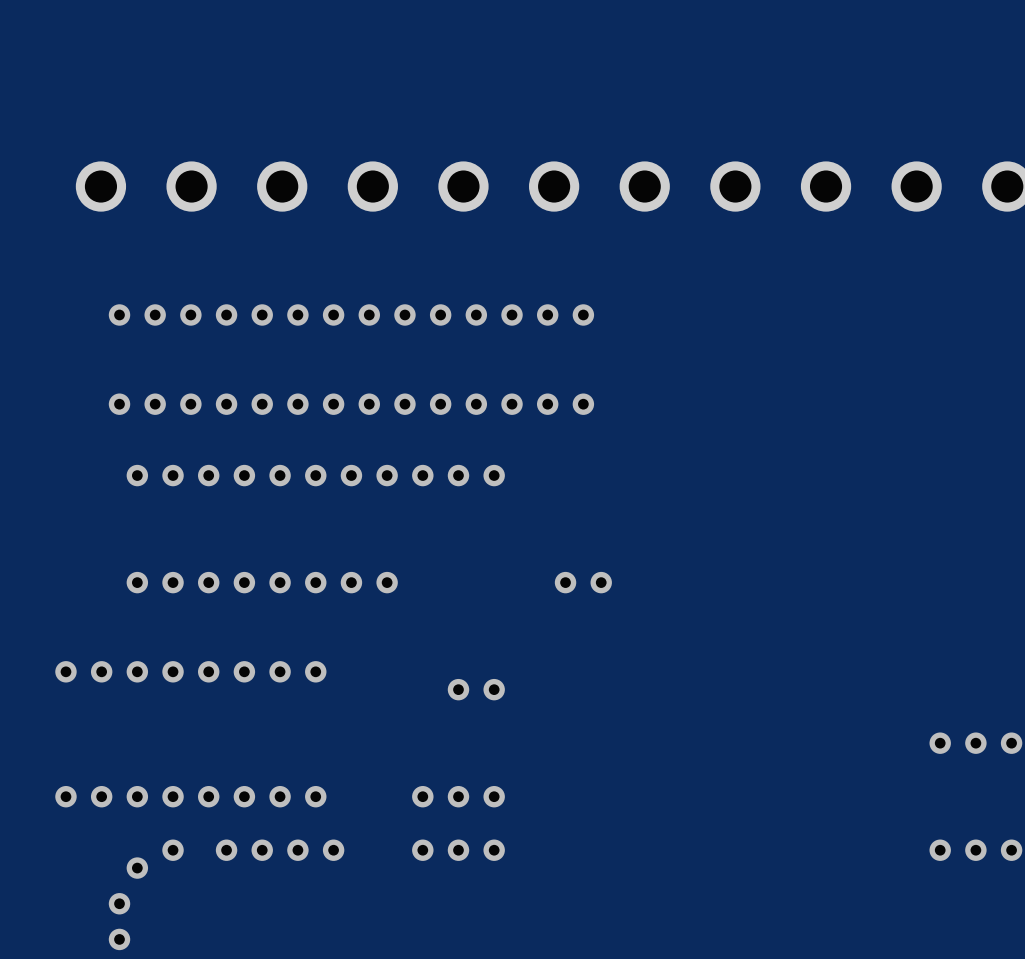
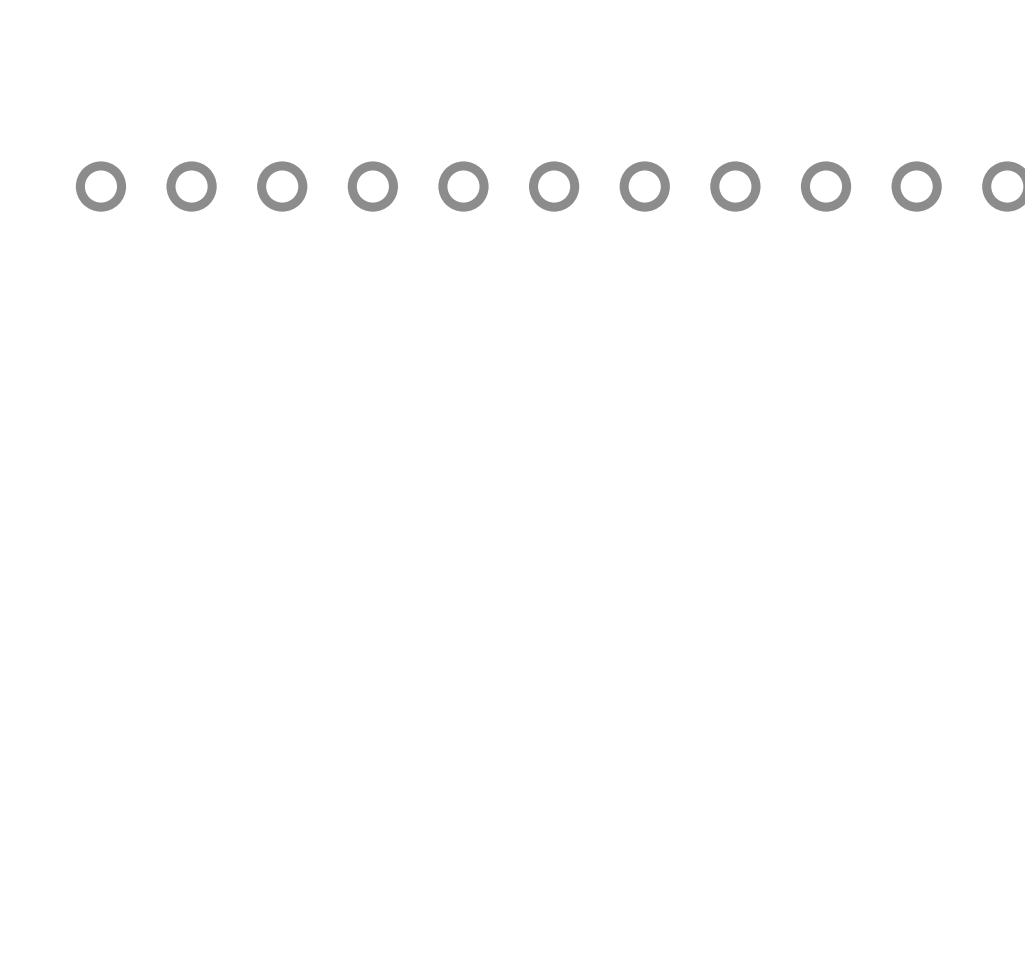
via: (119, 314) -> none
via: (155, 314) -> none
via: (190, 314) -> none
via: (226, 314) -> none
via: (262, 314) -> none
via: (297, 314) -> none
via: (333, 314) -> none
via: (369, 314) -> none
via: (404, 314) -> none
via: (440, 314) -> none
via: (476, 314) -> none
via: (512, 314) -> none
via: (547, 314) -> none
via: (583, 314) -> none
via: (119, 404) -> none
via: (155, 404) -> none
via: (190, 404) -> none
via: (226, 404) -> none
via: (262, 404) -> none
via: (297, 404) -> none
via: (333, 404) -> none
via: (369, 404) -> none
via: (404, 404) -> none
via: (440, 404) -> none
via: (476, 404) -> none
via: (512, 404) -> none
via: (547, 404) -> none
via: (583, 404) -> none
via: (137, 475) -> none
via: (173, 475) -> none
via: (208, 475) -> none
via: (244, 475) -> none
via: (280, 475) -> none
via: (315, 475) -> none
via: (351, 475) -> none
via: (387, 475) -> none
via: (422, 475) -> none
via: (458, 475) -> none
via: (494, 475) -> none
via: (137, 582) -> none
via: (173, 582) -> none
via: (208, 582) -> none
via: (244, 582) -> none
via: (280, 582) -> none
via: (315, 582) -> none
via: (351, 582) -> none
via: (387, 582) -> none
via: (565, 582) -> none
via: (601, 582) -> none
via: (65, 671) -> none
via: (101, 671) -> none
via: (137, 671) -> none
via: (173, 671) -> none
via: (208, 671) -> none
via: (244, 671) -> none
via: (280, 671) -> none
via: (315, 671) -> none
via: (458, 689) -> none
via: (494, 689) -> none
via: (940, 743) -> none
via: (975, 743) -> none
via: (1011, 743) -> none
via: (65, 796) -> none
via: (101, 796) -> none
via: (137, 796) -> none
via: (173, 796) -> none
via: (208, 796) -> none
via: (244, 796) -> none
via: (280, 796) -> none
via: (315, 796) -> none
via: (422, 796) -> none
via: (458, 796) -> none
via: (494, 796) -> none
via: (173, 850) -> none
via: (226, 850) -> none
via: (262, 850) -> none
via: (297, 850) -> none
via: (333, 850) -> none
via: (422, 850) -> none
via: (458, 850) -> none
via: (494, 850) -> none
via: (940, 850) -> none
via: (975, 850) -> none
via: (1011, 850) -> none
via: (137, 868) -> none
via: (119, 903) -> none
via: (119, 939) -> none

